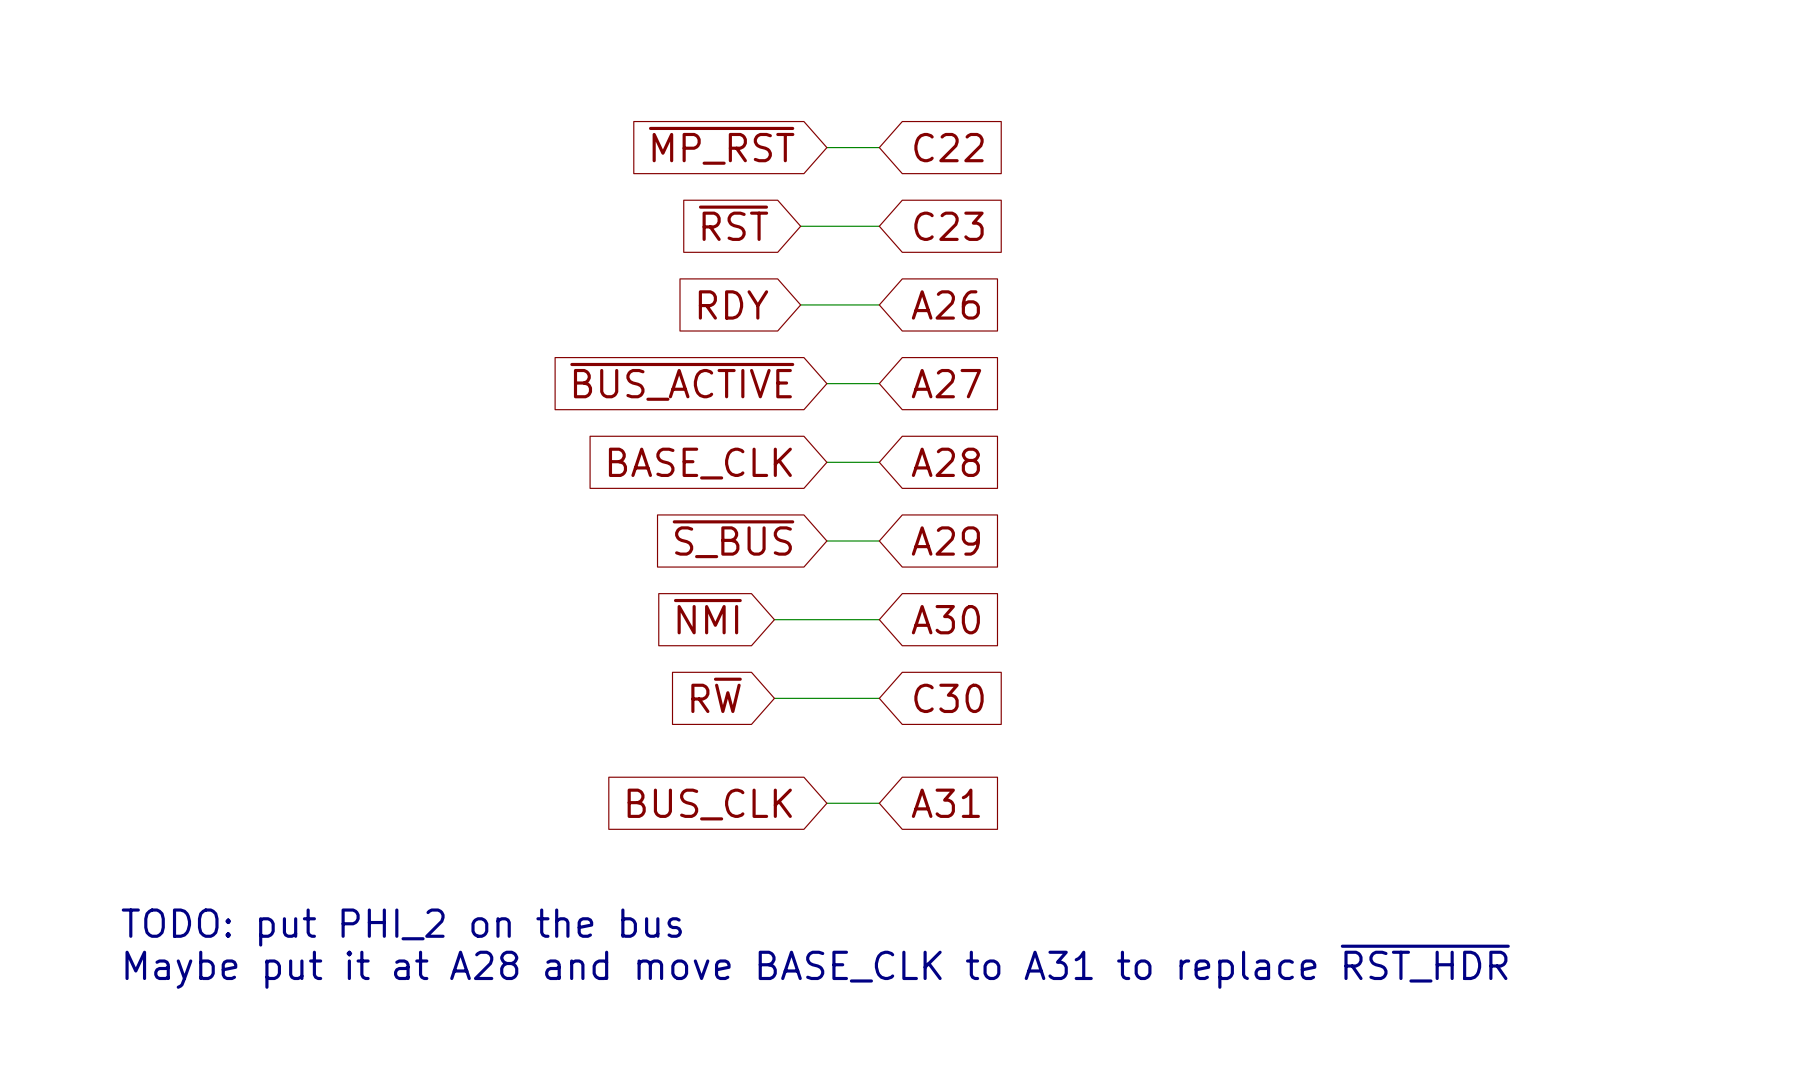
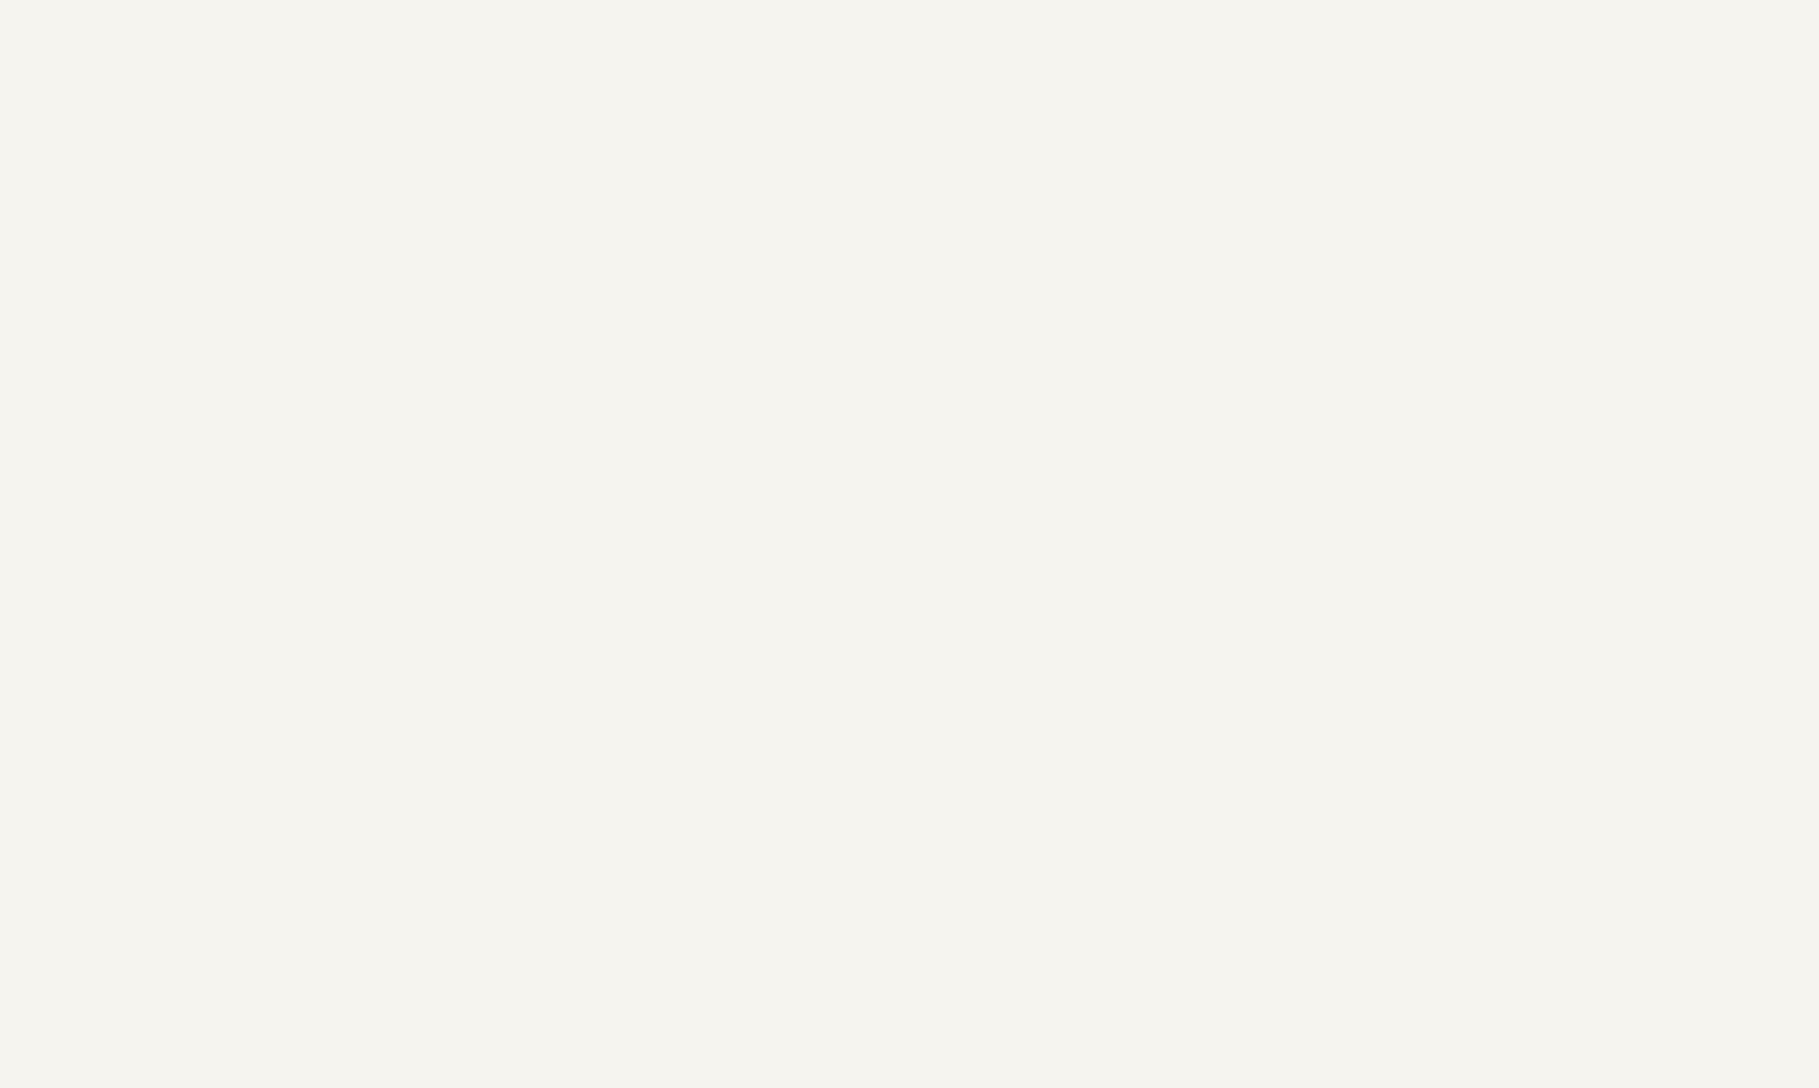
global label: ~{MP_RST} (721, 145) -> none
wire: (826, 147) (879, 147) -> none
global label: C22 (949, 147) -> none
global label: ~{RST} (733, 223) -> none
wire: (800, 226) (879, 226) -> none
global label: C23 (949, 226) -> none
global label: RDY (733, 304) -> none
wire: (800, 304) (879, 304) -> none
global label: A26 (945, 304) -> none
global label: ~{BUS_ACTIVE} (682, 381) -> none
wire: (826, 383) (879, 383) -> none
global label: A27 (946, 383) -> none
wire: (826, 462) (879, 462) -> none
global label: A28 (945, 462) -> none
global label: BASE_CLK (700, 463) -> none
global label: ~{S_BUS} (733, 539) -> none
wire: (826, 541) (879, 541) -> none
global label: A29 (945, 541) -> none
global label: ~{NMI} (707, 616) -> none
wire: (774, 619) (879, 619) -> none
global label: A30 (945, 619) -> none
global label: R~{W} (716, 695) -> none
wire: (774, 698) (879, 698) -> none
global label: C30 (949, 698) -> none
wire: (826, 803) (879, 803) -> none
global label: A31 (945, 803) -> none
global label: BUS_CLK (709, 804) -> none
text: TODO: put PHI_2 on the bus (401, 927) -> none
text: Maybe put it at A28 and move BASE_CLK to A31 to replace ~{RST_HDR} (817, 966) -> none

